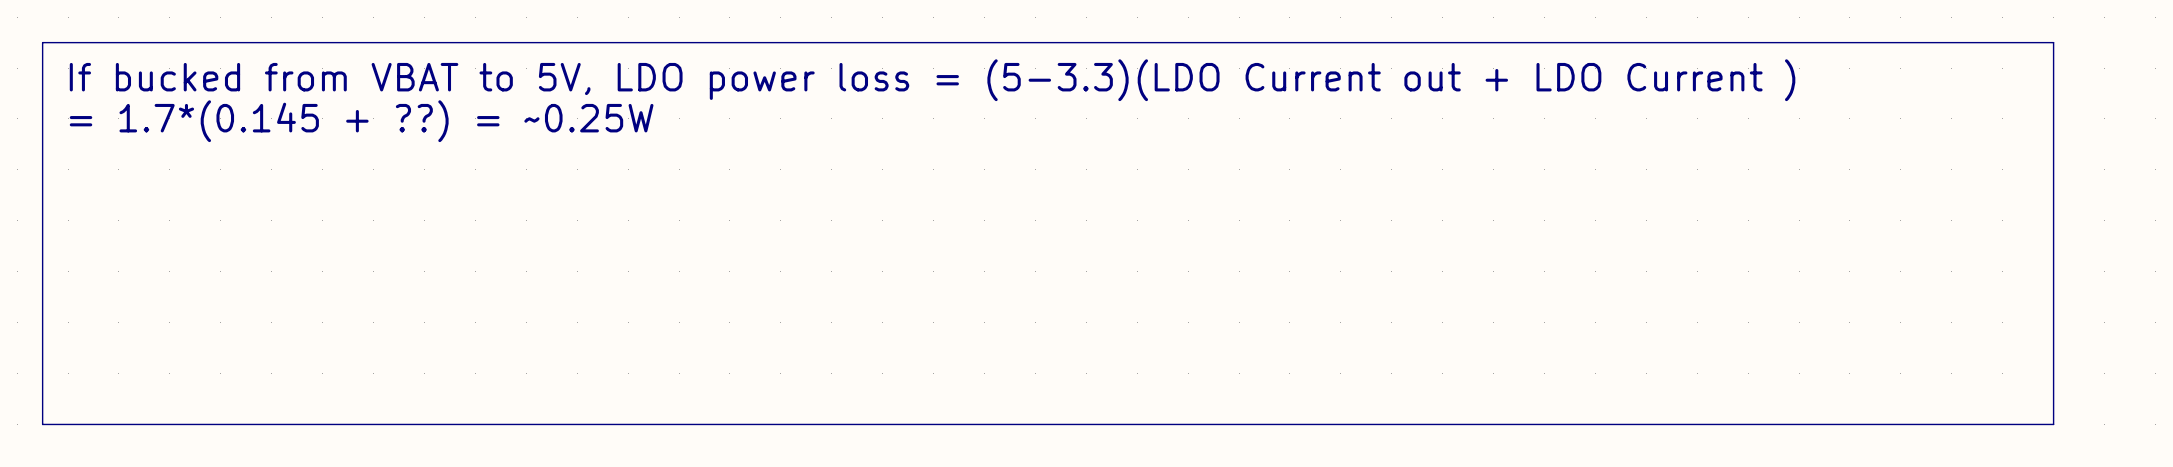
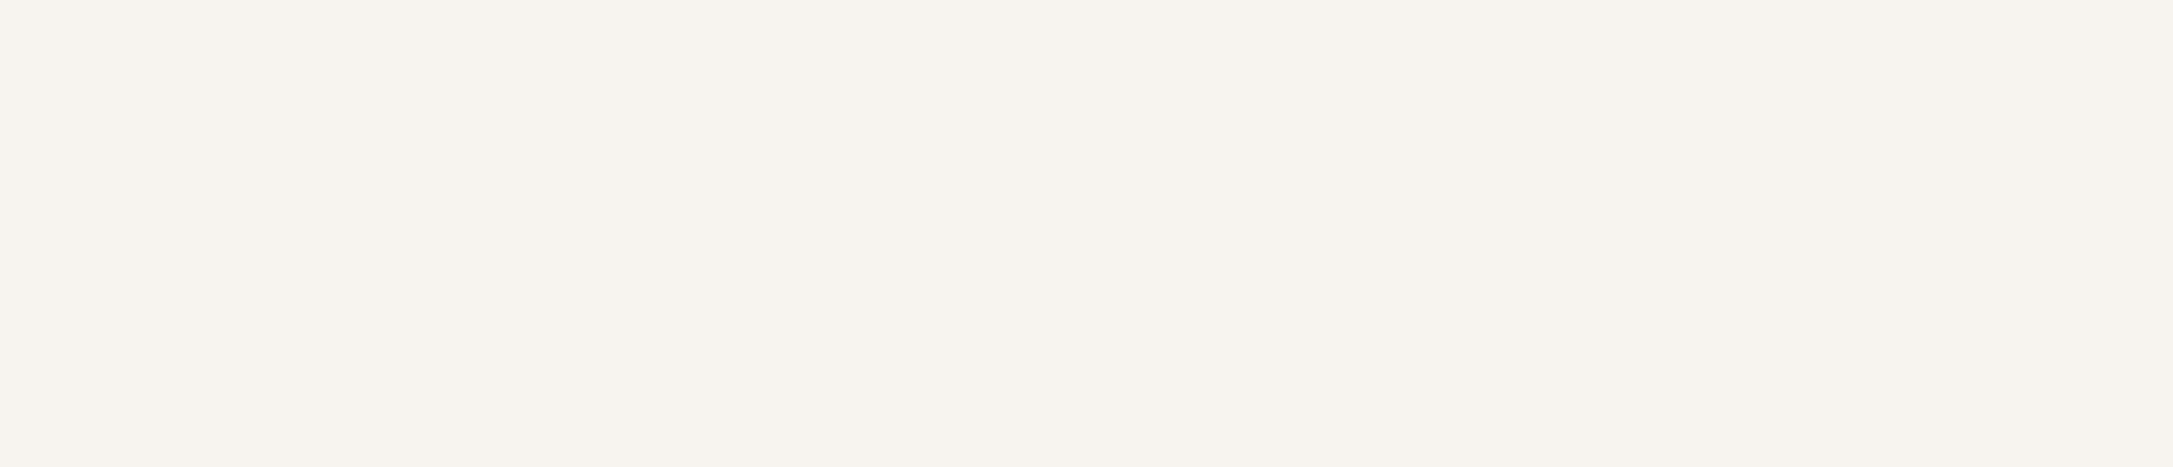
line: (42, 42) (2053, 42) (2053, 424) (42, 424) (42, 42) -> none
text: If bucked from VBAT to 5V, LDO power loss = (5-3.3)(LDO Current out + LDO Current ) (932, 80) -> none
text: = 1.7*(0.145 + ??) = ~0.25W (361, 121) -> none

